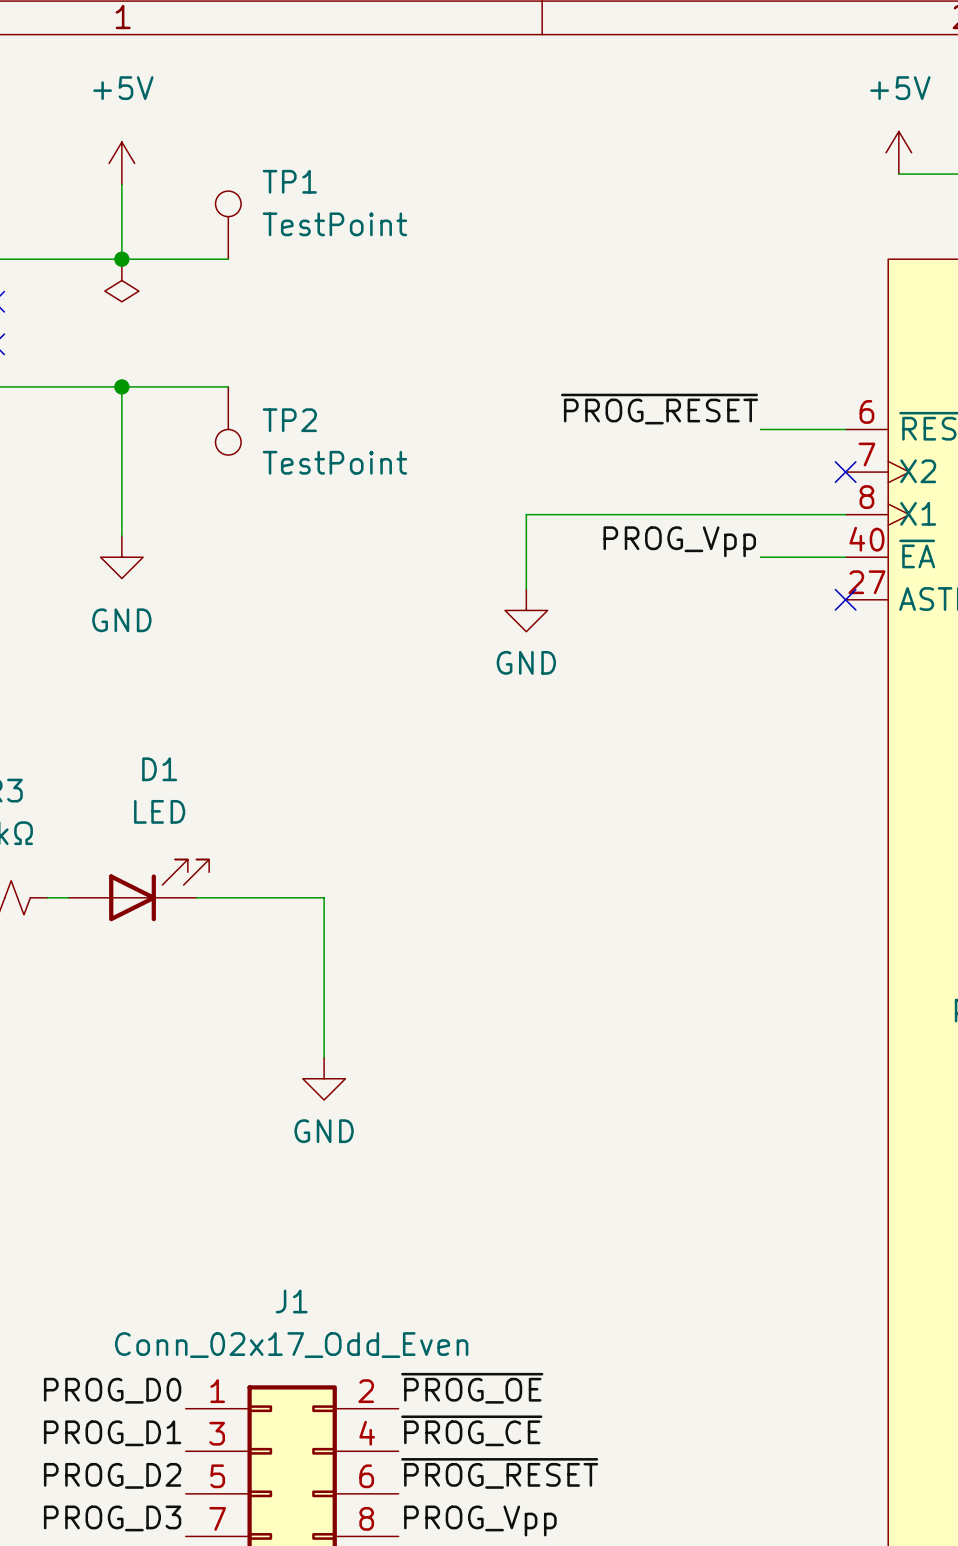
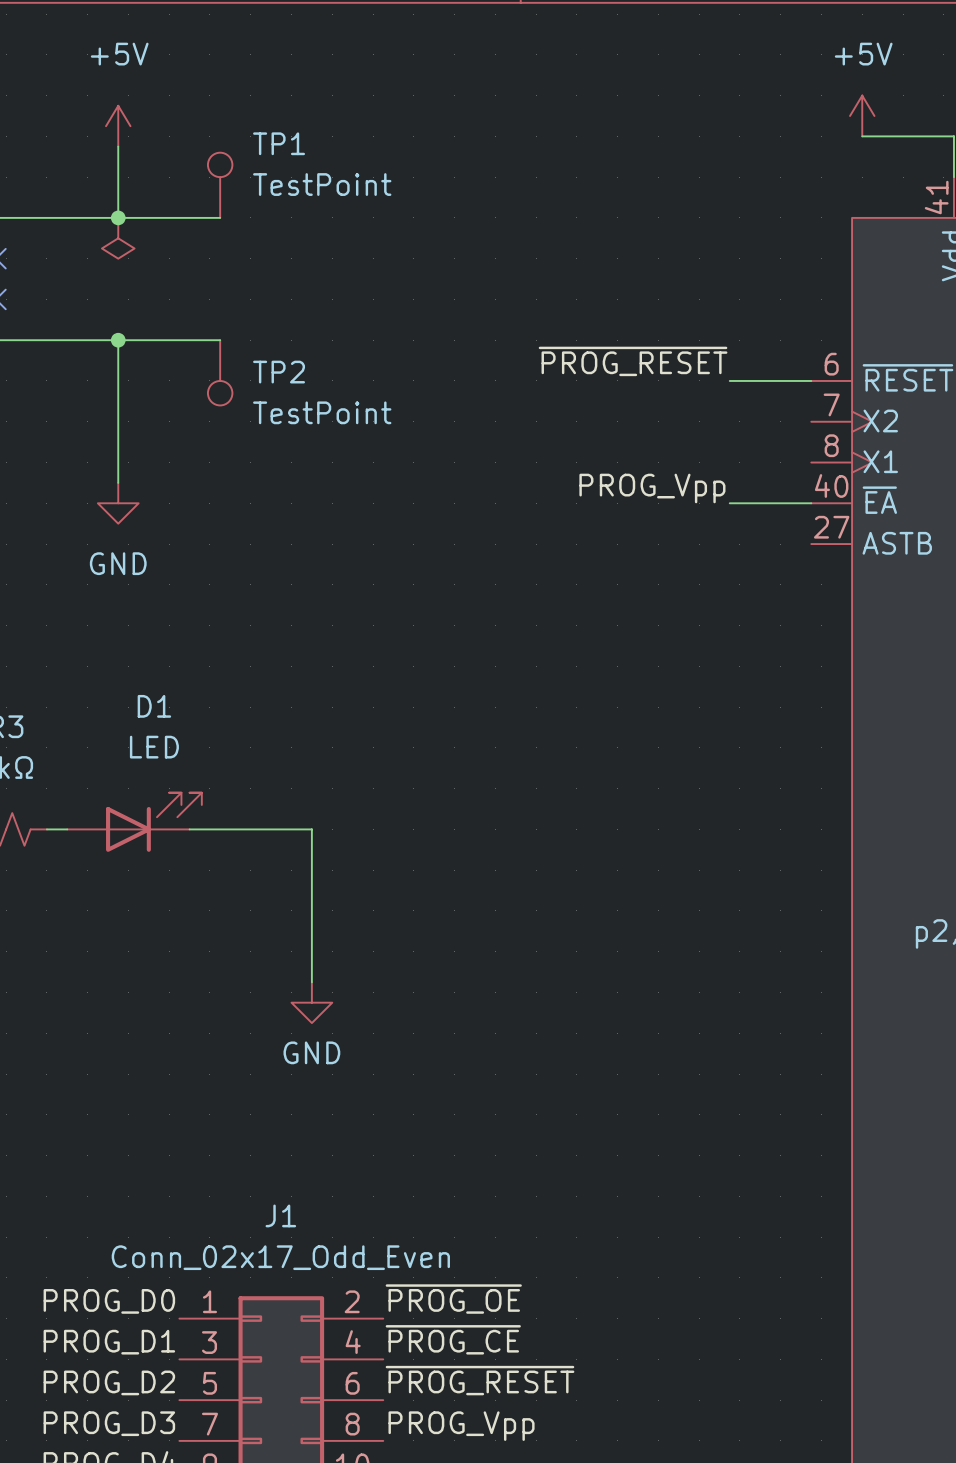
no-connect mark: (845, 472) -> none
wire: (845, 514) (526, 514) (526, 589) -> none
no-connect mark: (845, 599) -> none
power symbol: GND (526, 610) -> none

